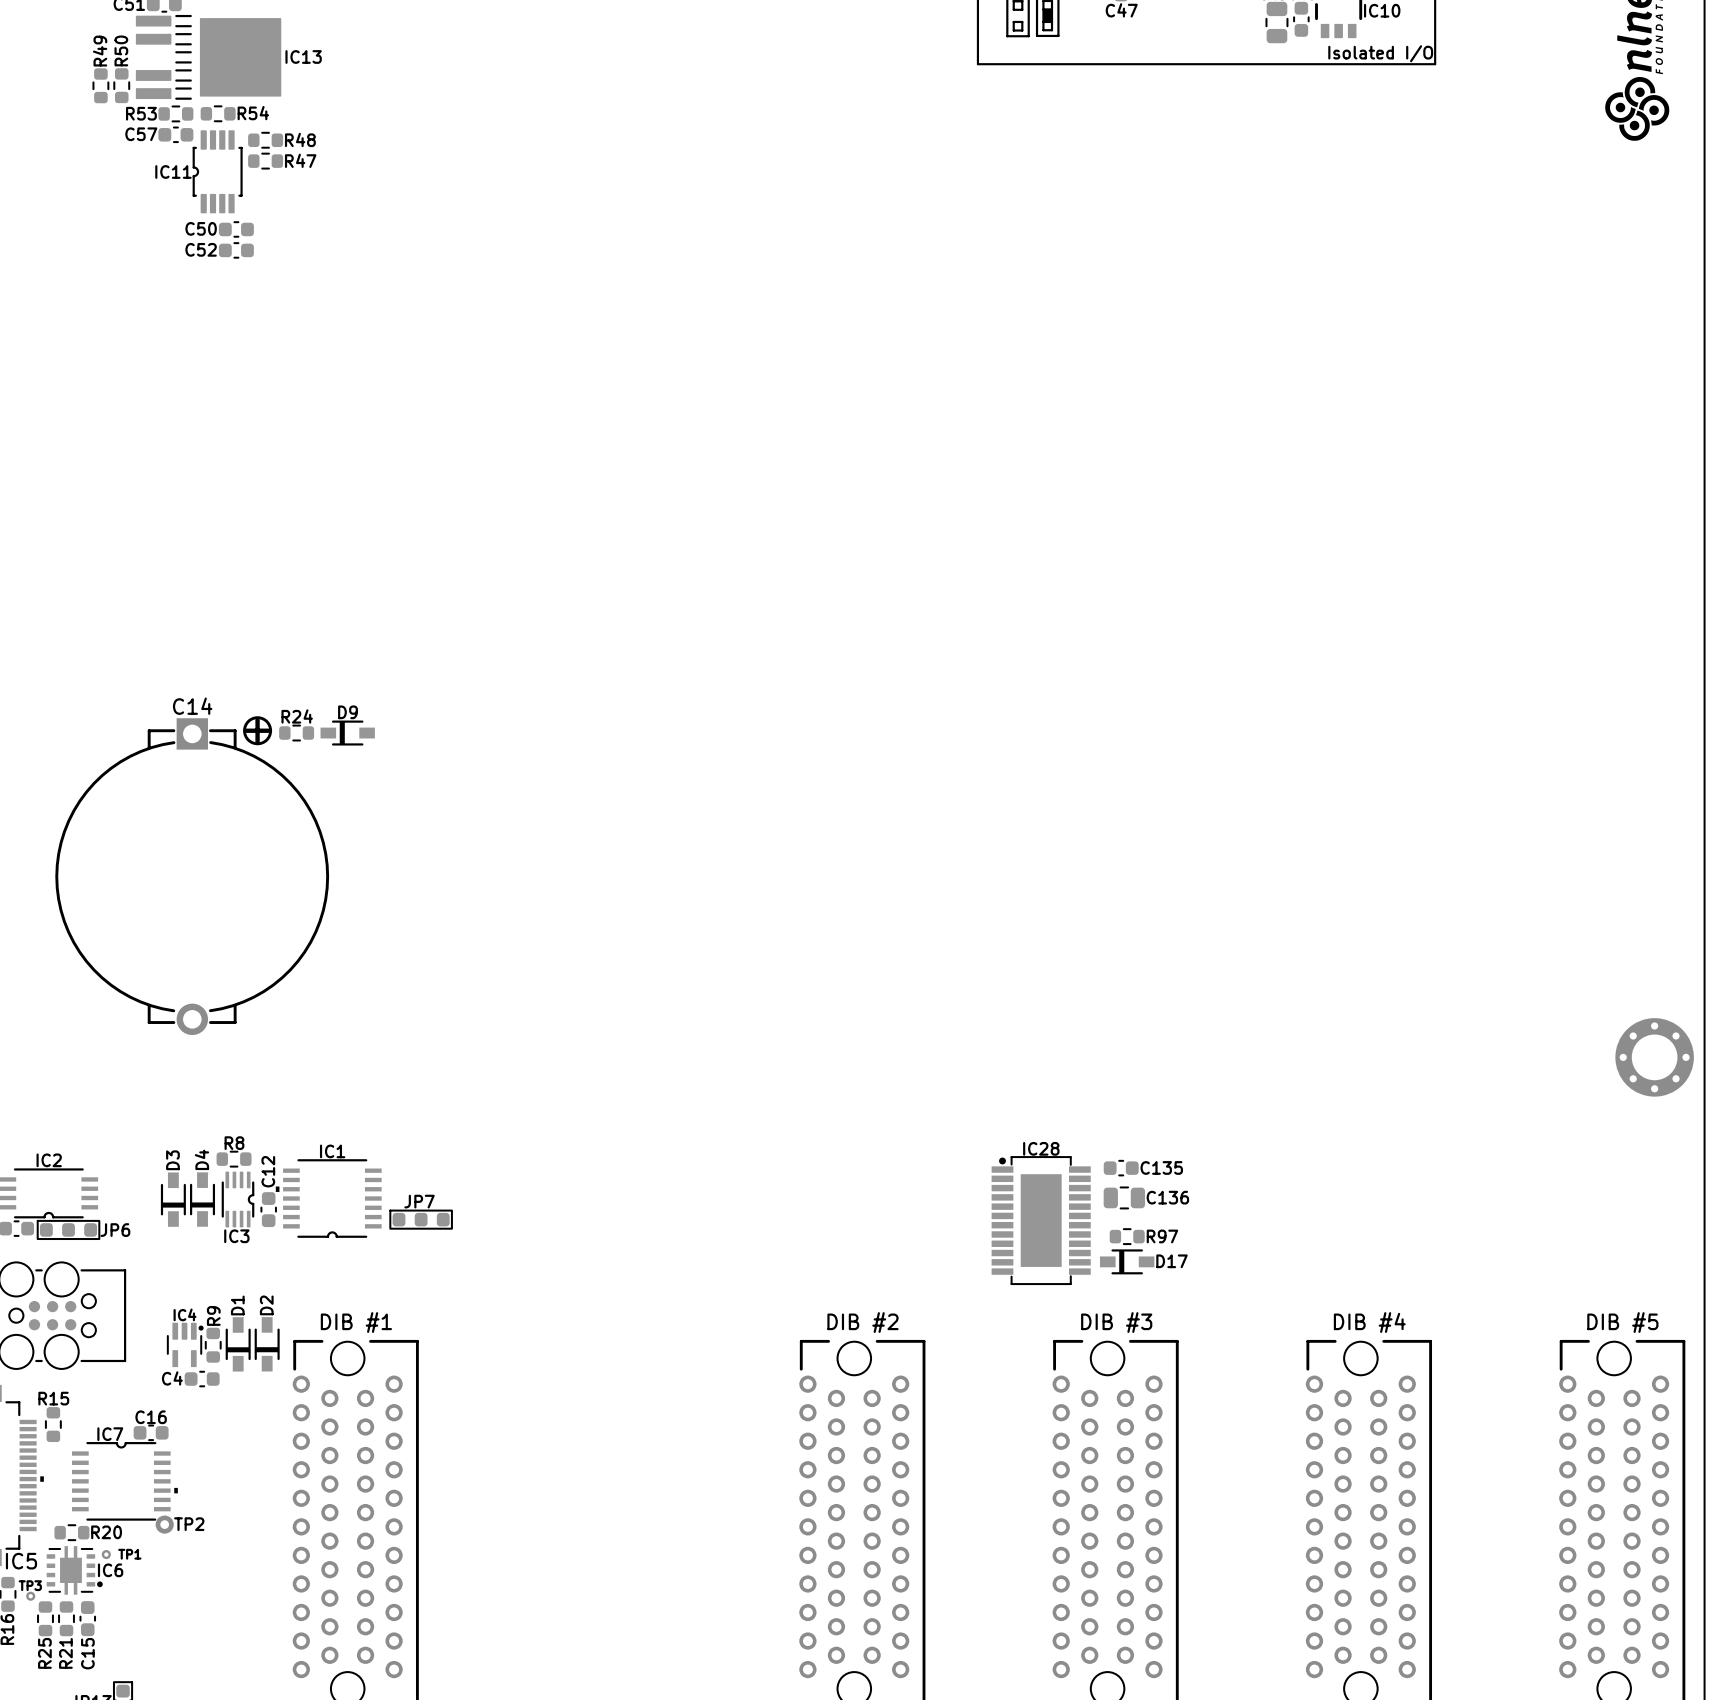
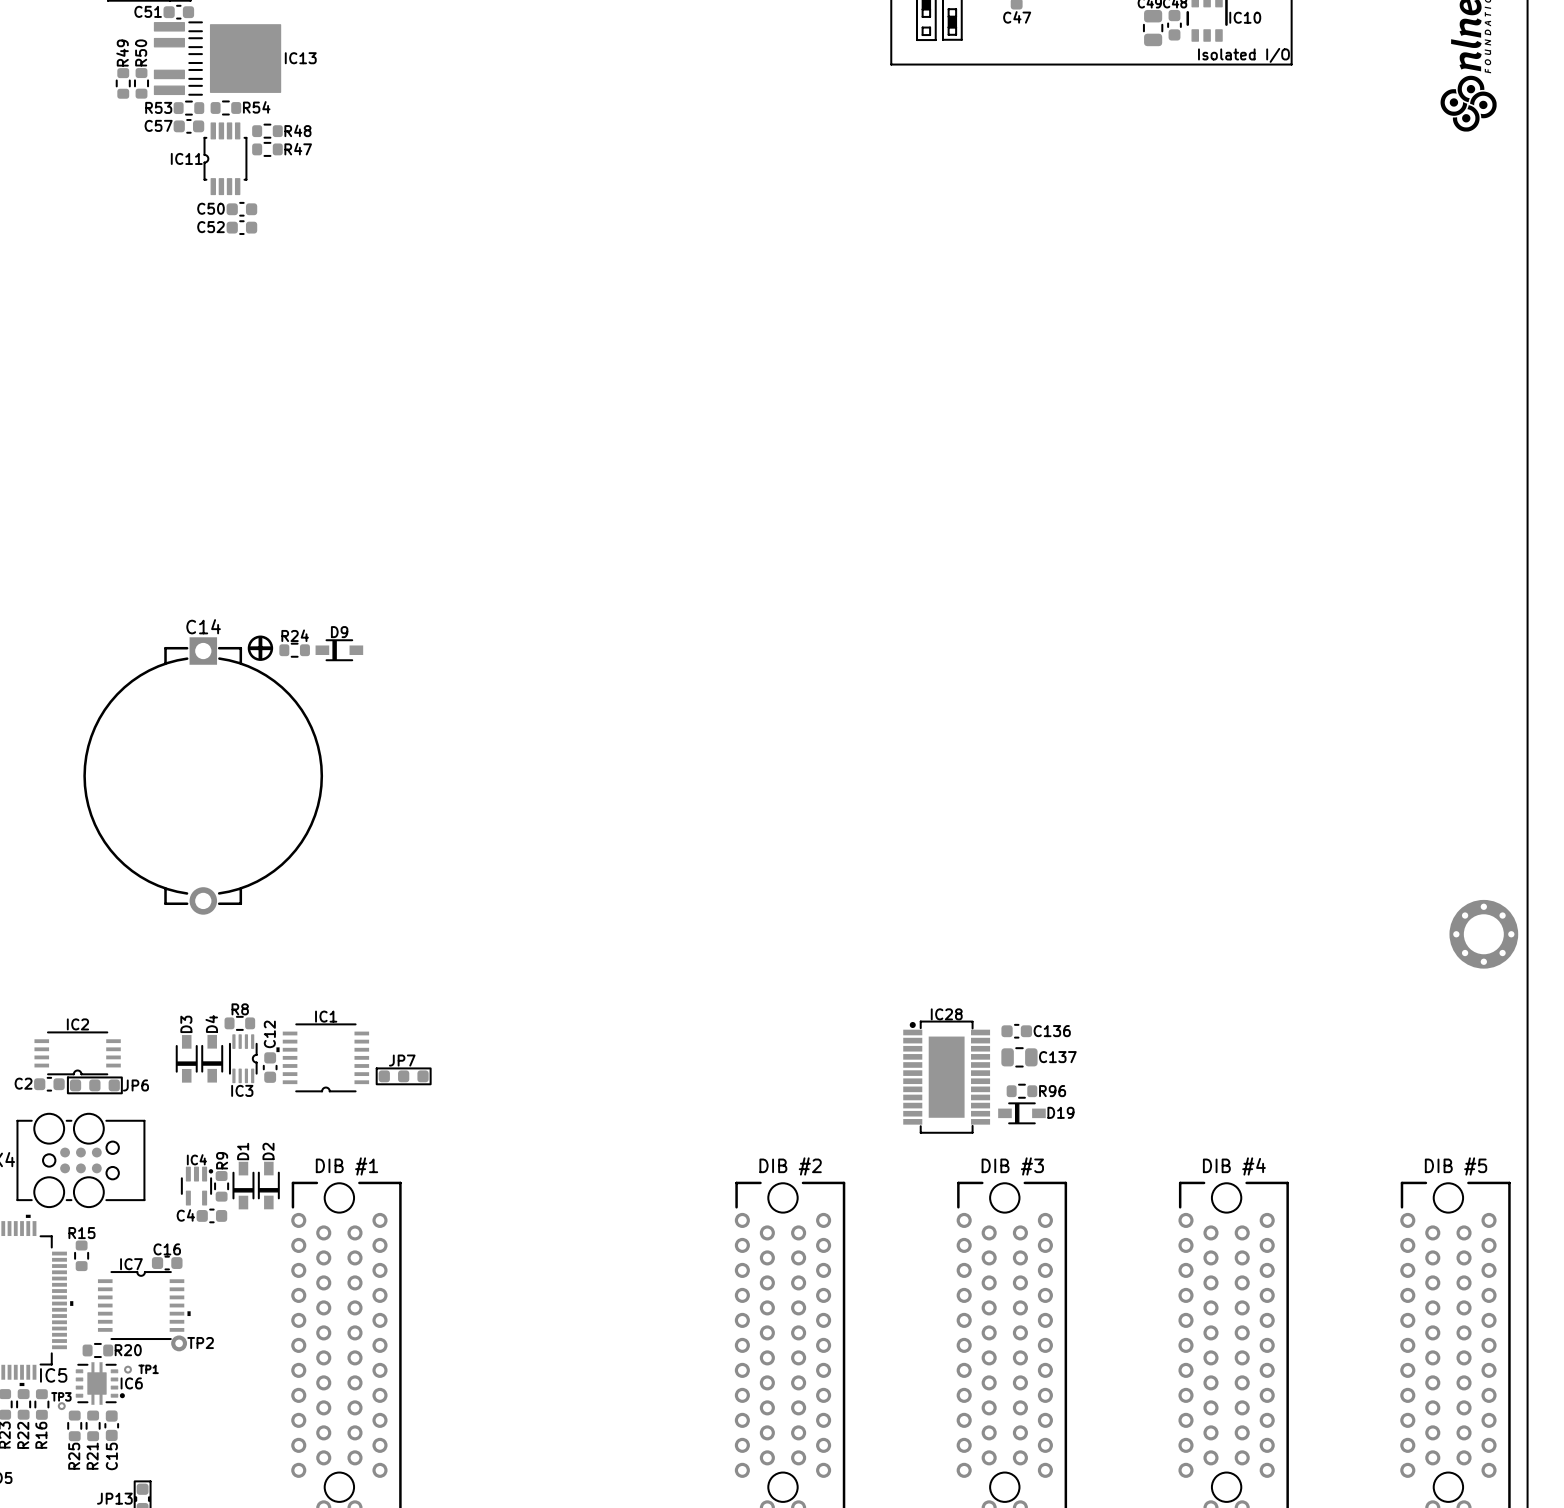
C135 name: C135 (1161, 1167) -> C136 (1052, 1031)
C136 name: C136 (1167, 1197) -> C137 (1057, 1057)
R97 name: R97 (1162, 1236) -> R96 (1052, 1091)
D17 name: D17 (1171, 1261) -> D19 (1060, 1112)

